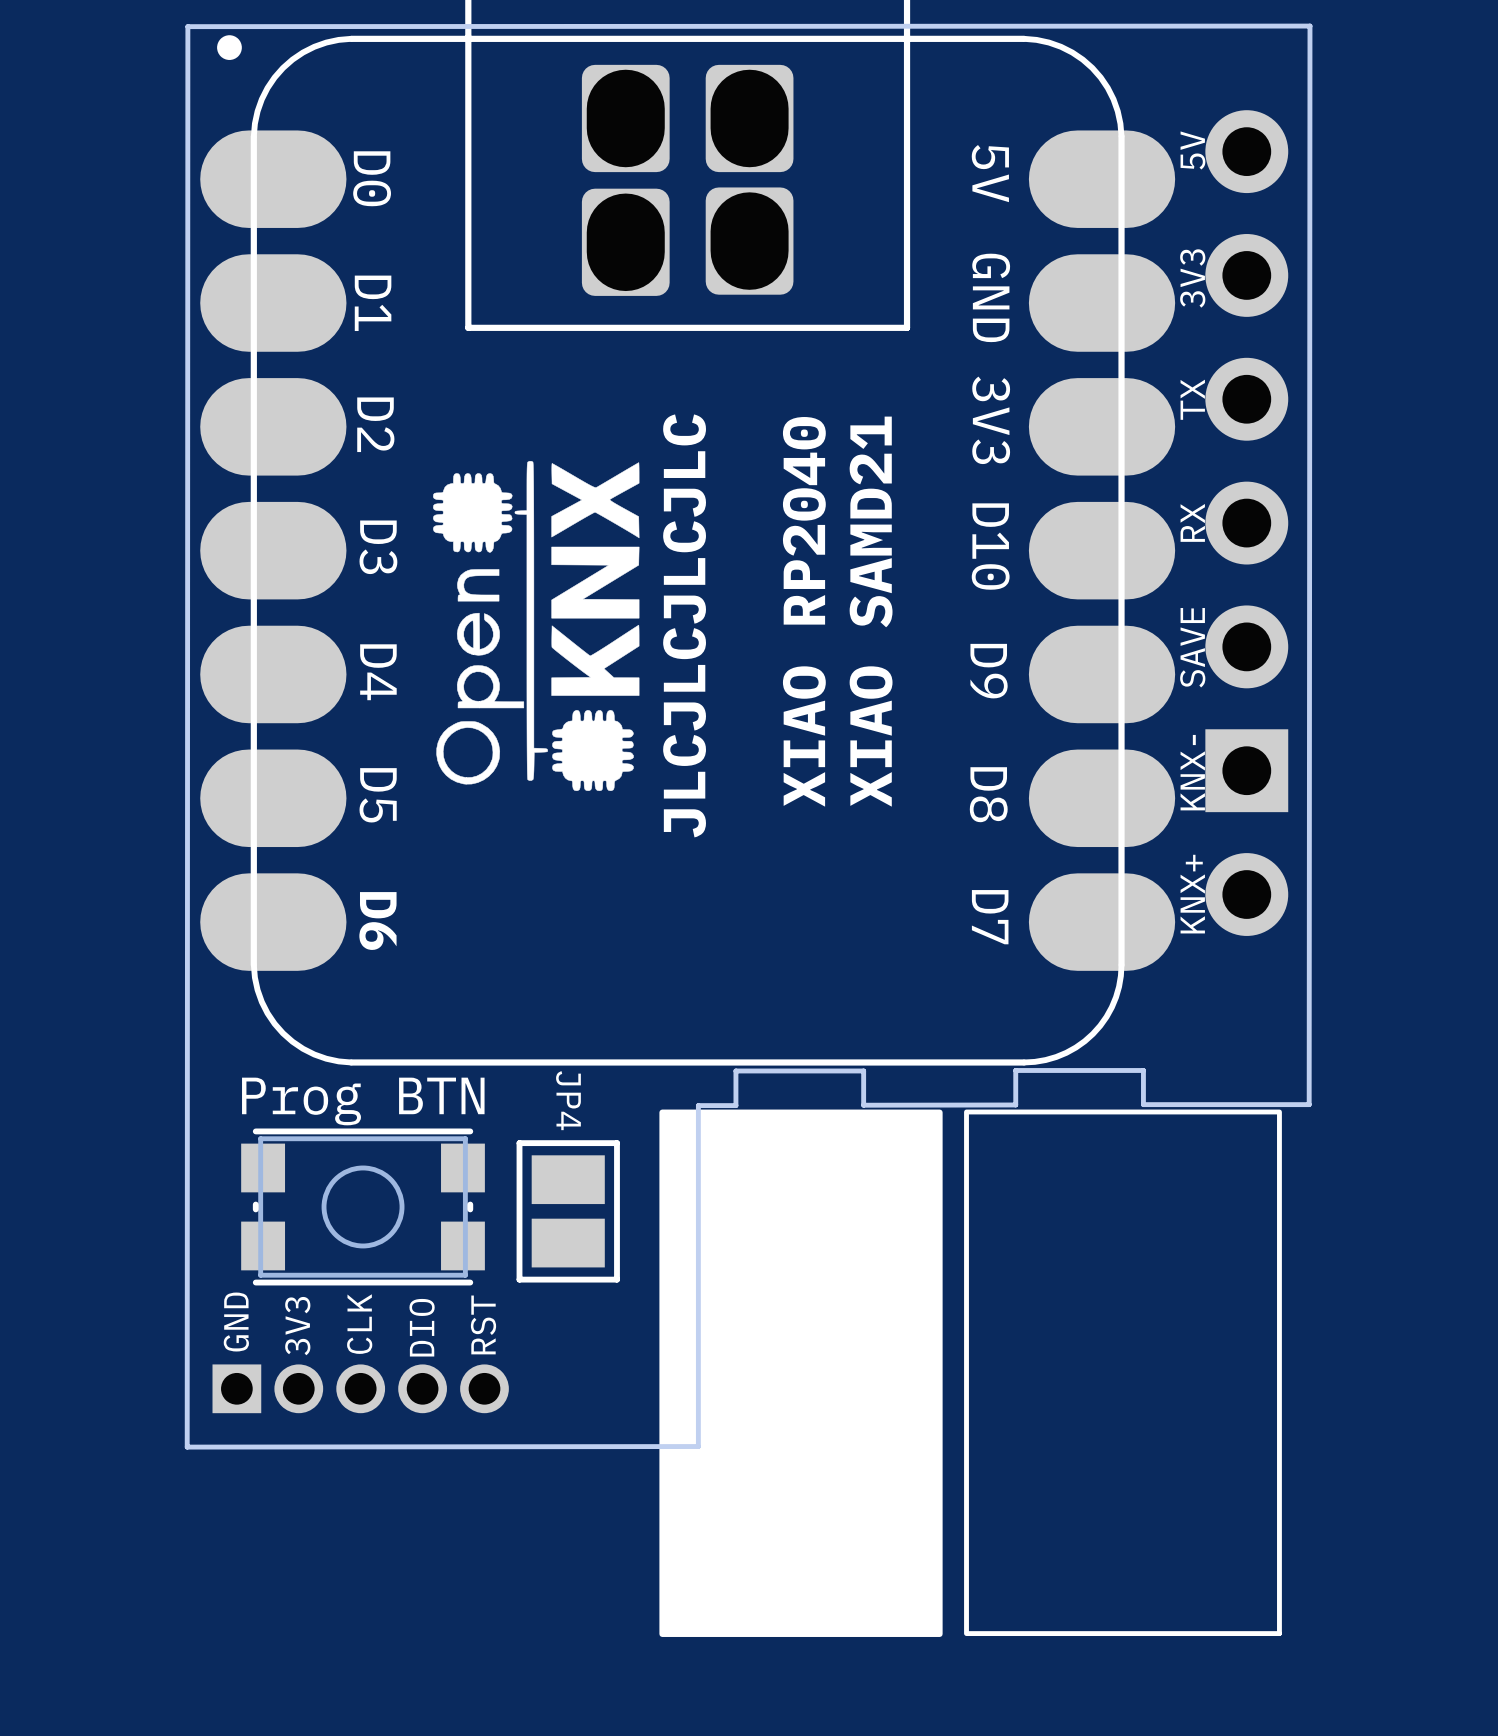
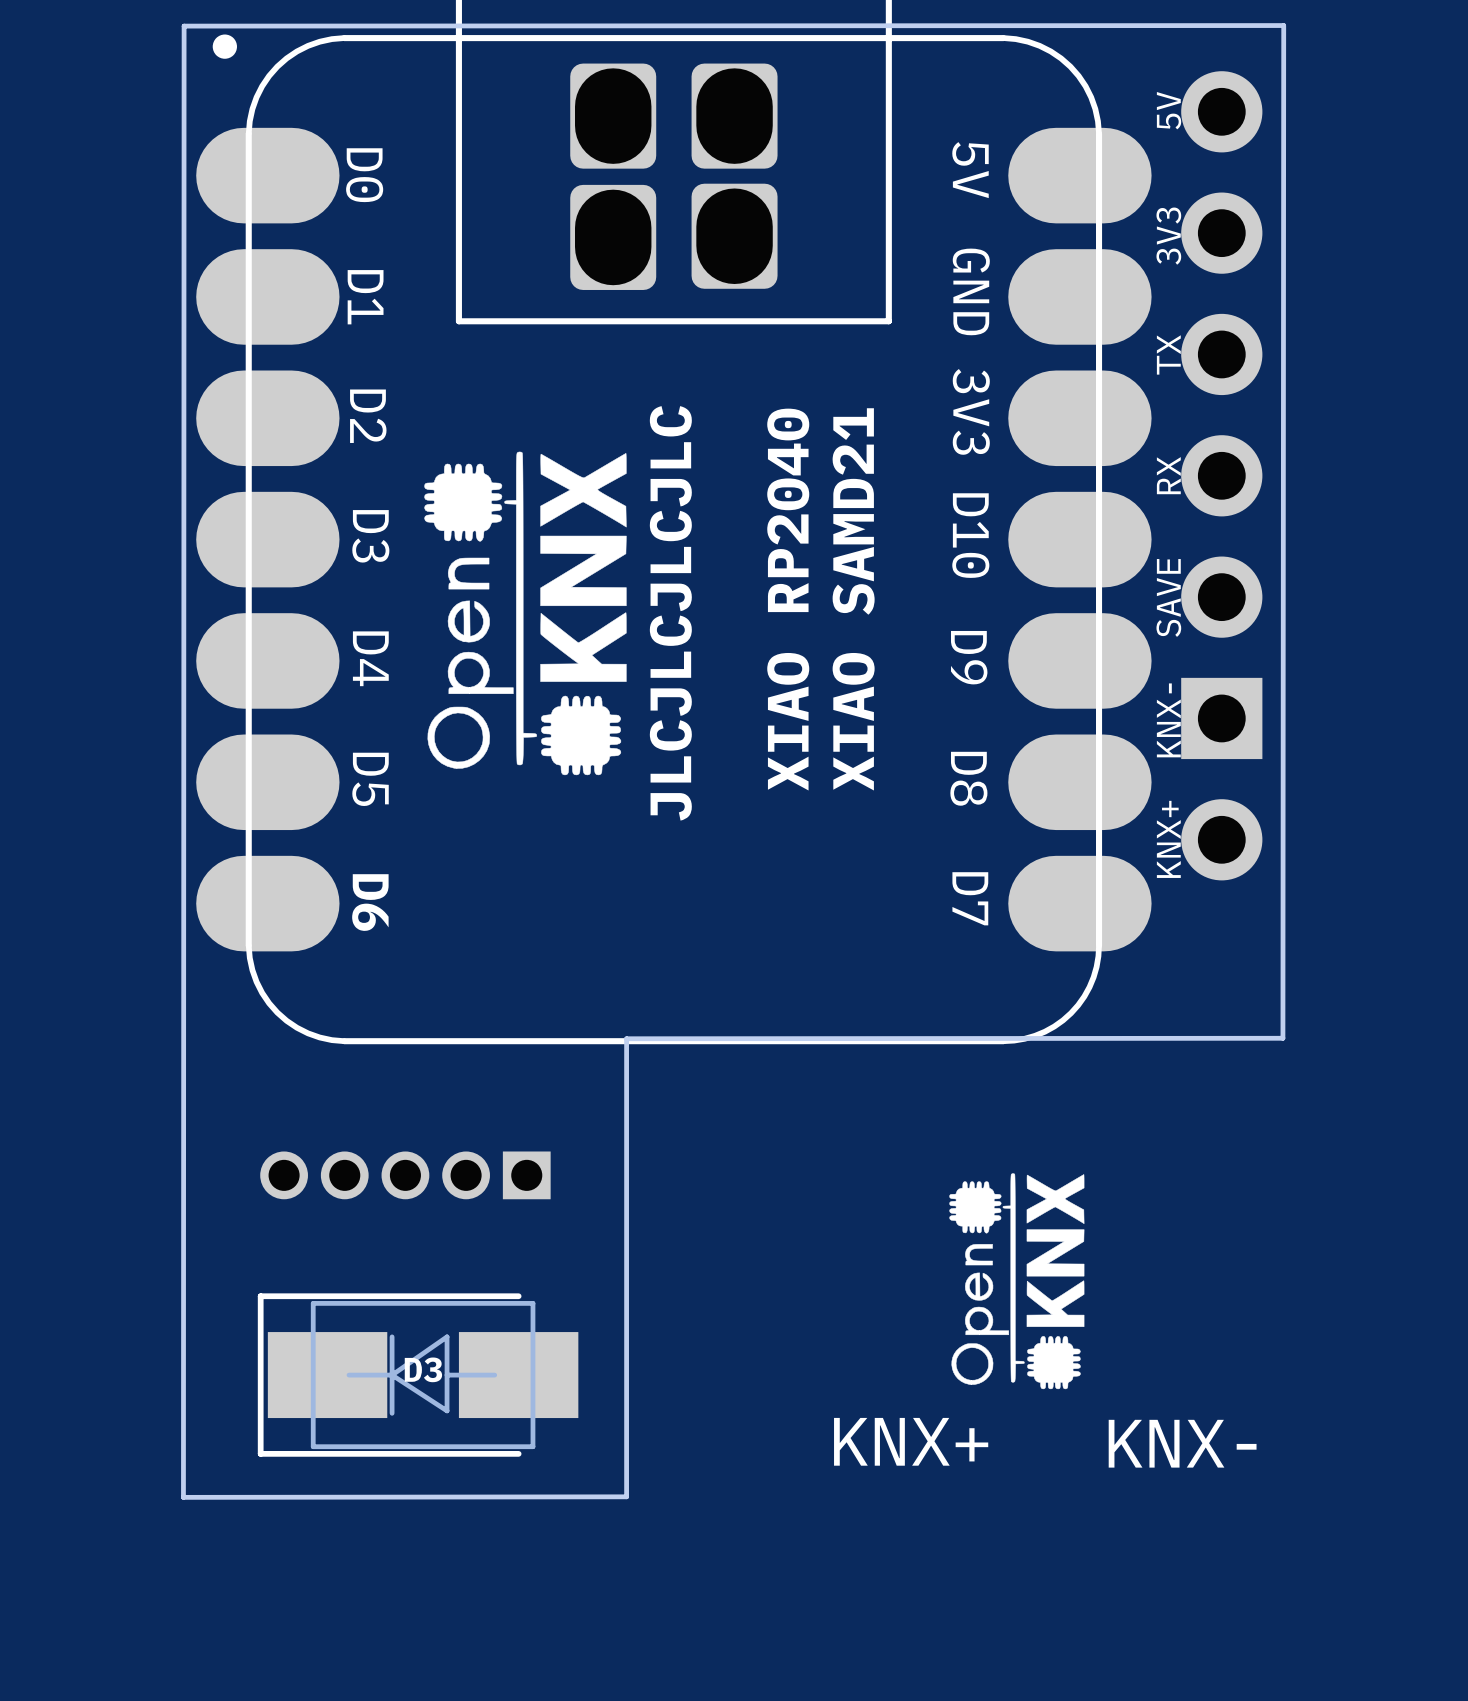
part position: (1246, 523) -> (1221, 475)
board edge: (1309, 1059) (1309, 1104) (1143, 1104) (1143, 1070) (1015, 1070) (1015, 1104) (863, 1105) (863, 1070) (735, 1070) (735, 1105) (698, 1105) (698, 1446) (187, 1447) -> (1282, 1038) (626, 1038) (626, 1496) (183, 1497) (183, 1418)
drawing: none -> [949, 1173, 1085, 1390]
part: none -> (405, 1175)
part: Prog BTN (363, 1206) -> none
JP4: (568, 1211) -> none
part: (970, 1373) -> none
part: (360, 1388) -> none
D3: none -> (418, 1375)
text: none -> KNX+ (911, 1441)
text: none -> KNX- (1182, 1443)

